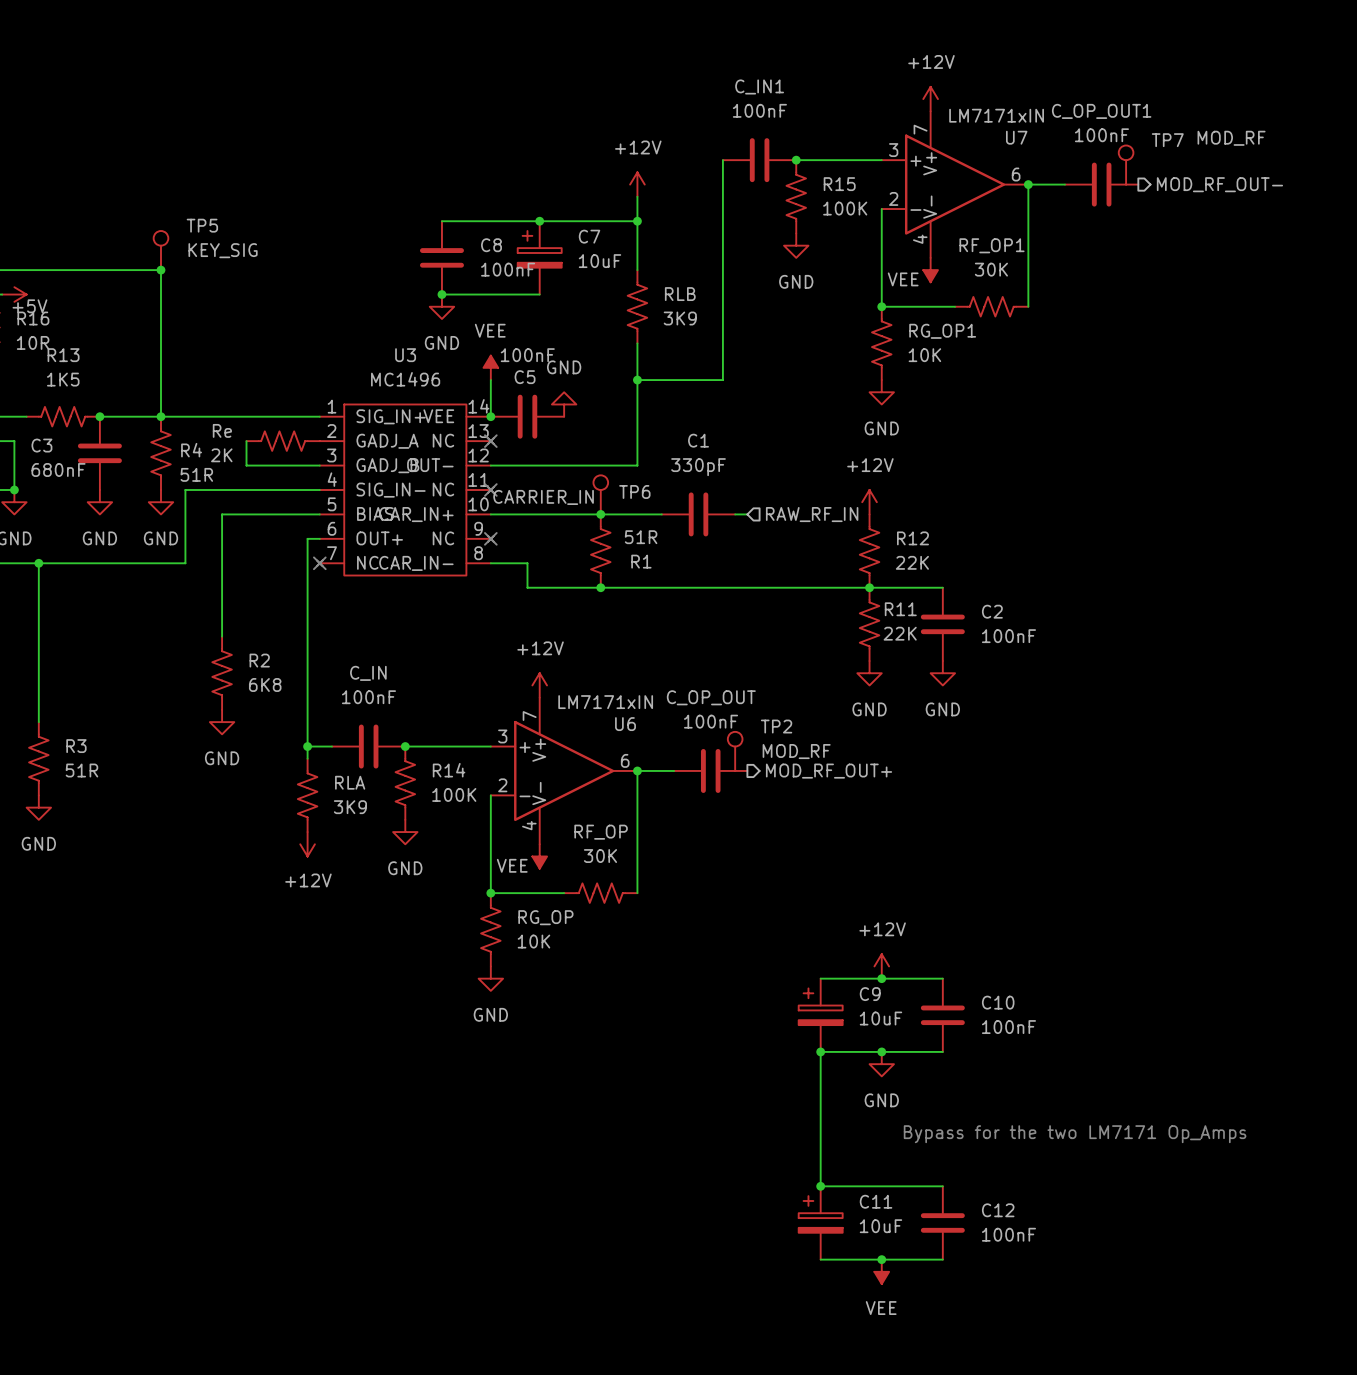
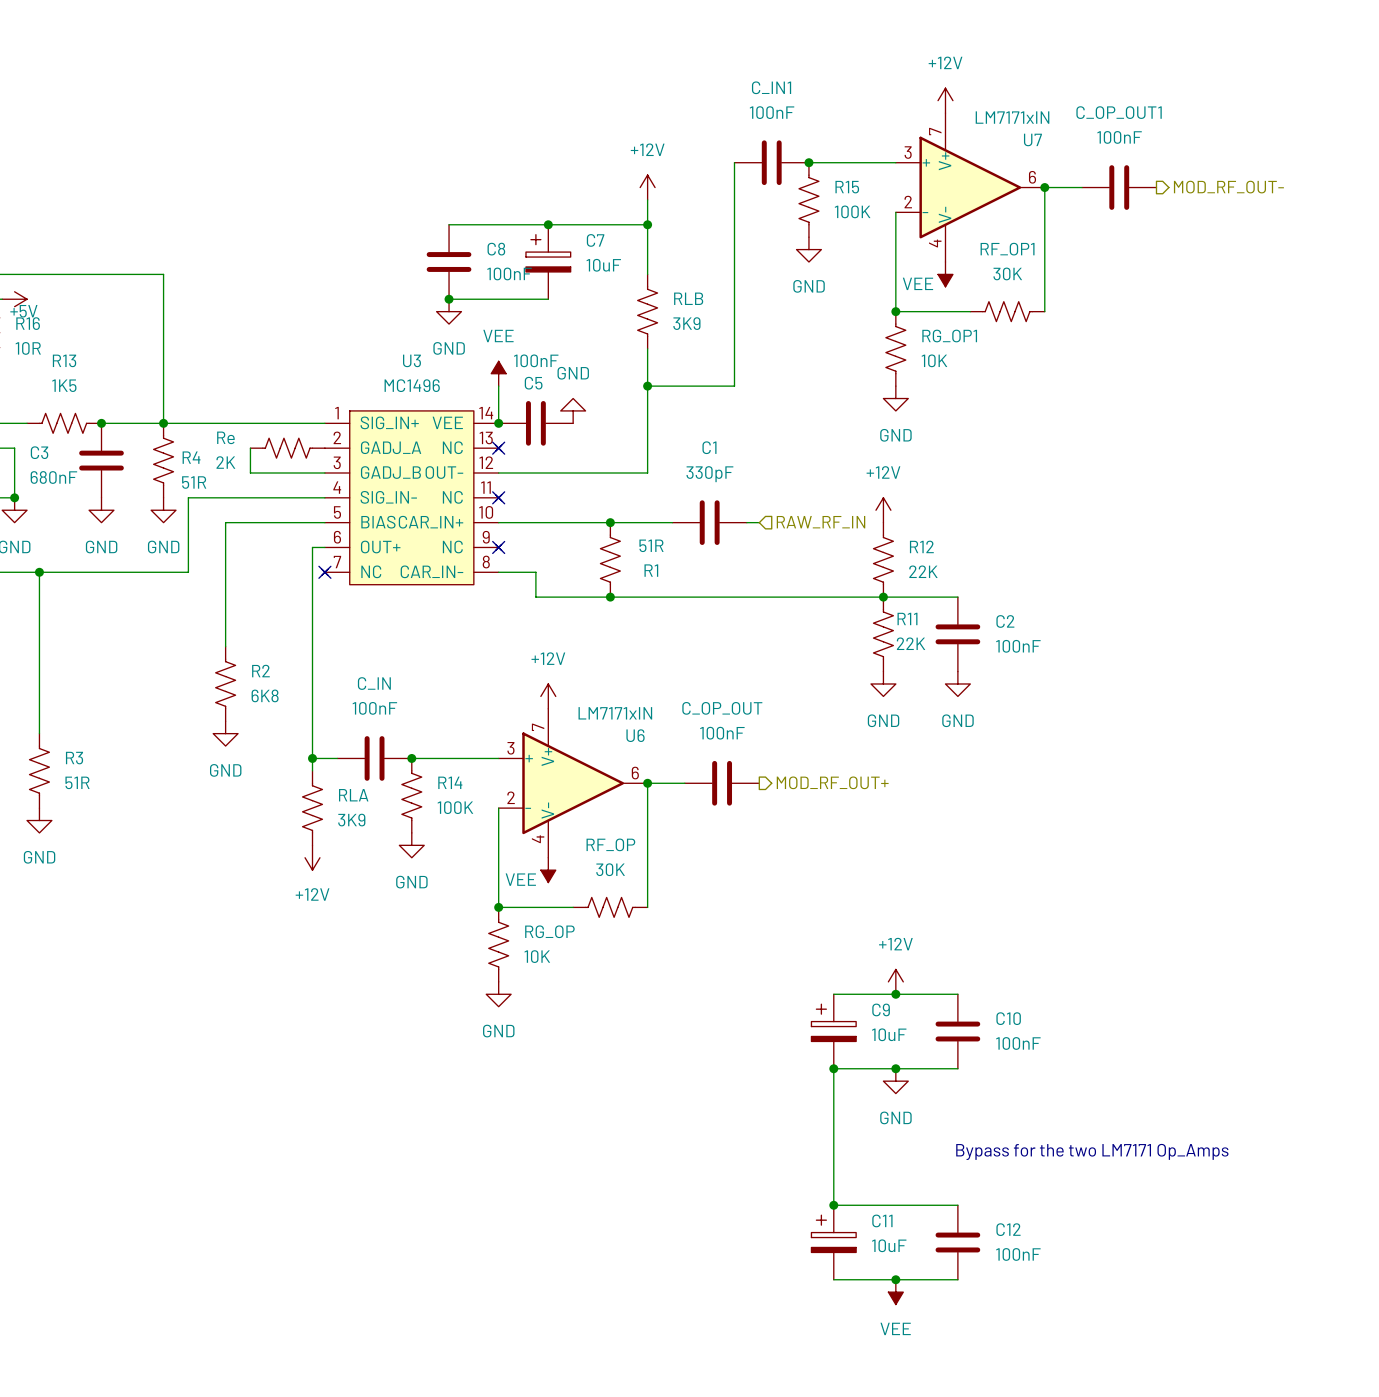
TP7: MOD_RF (1126, 165) -> none
TP5: KEY_SIG (160, 250) -> none
junction: (160, 270) -> none
TP6: CARRIER_IN (600, 494) -> none
TP2: MOD_RF (735, 751) -> none

